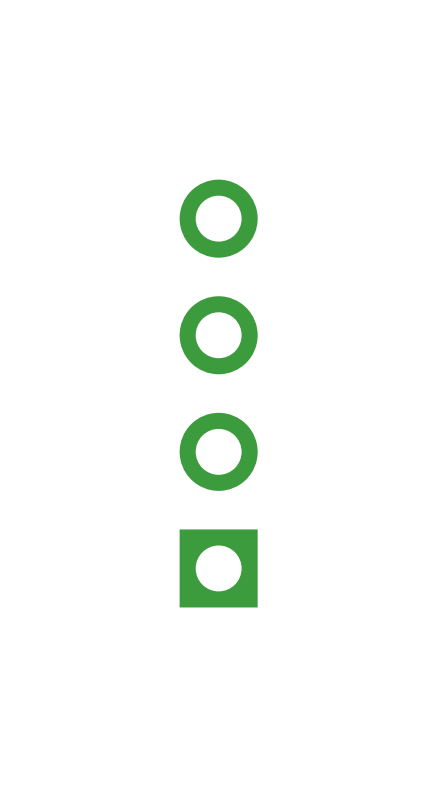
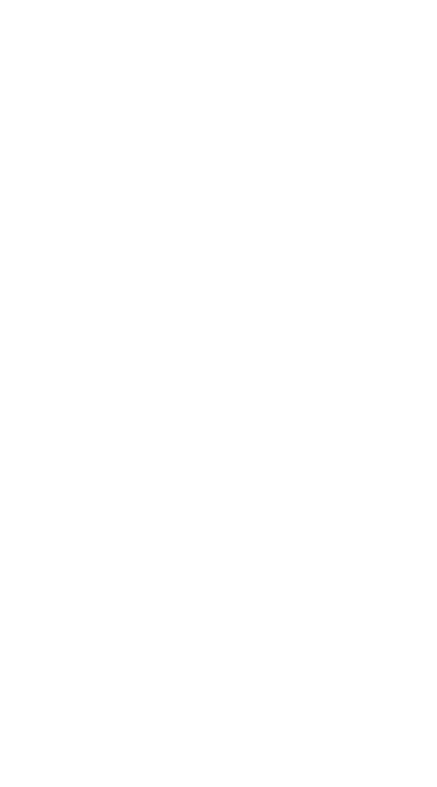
part: (218, 393) -> none

